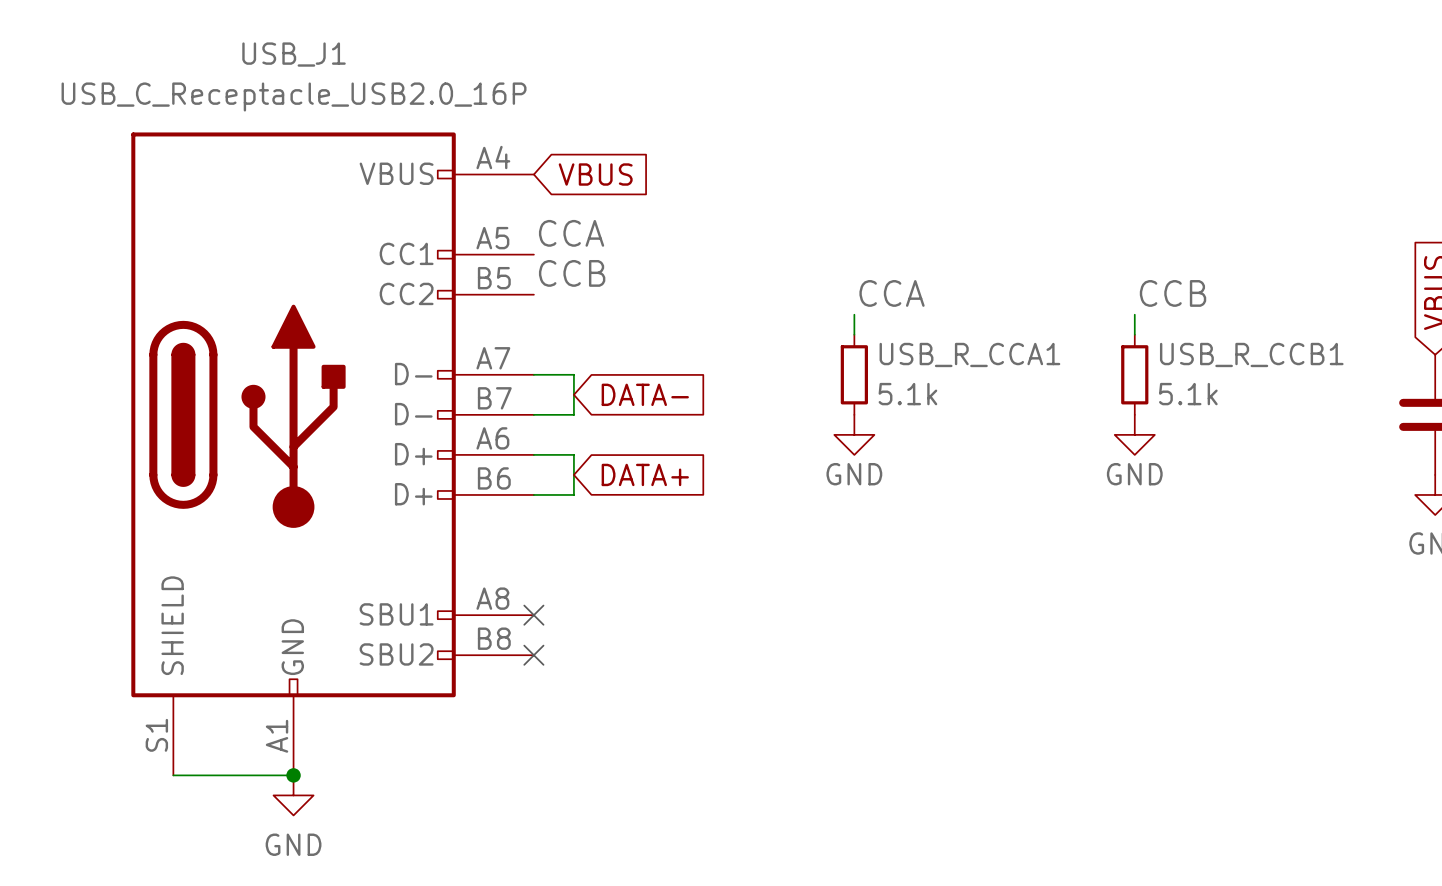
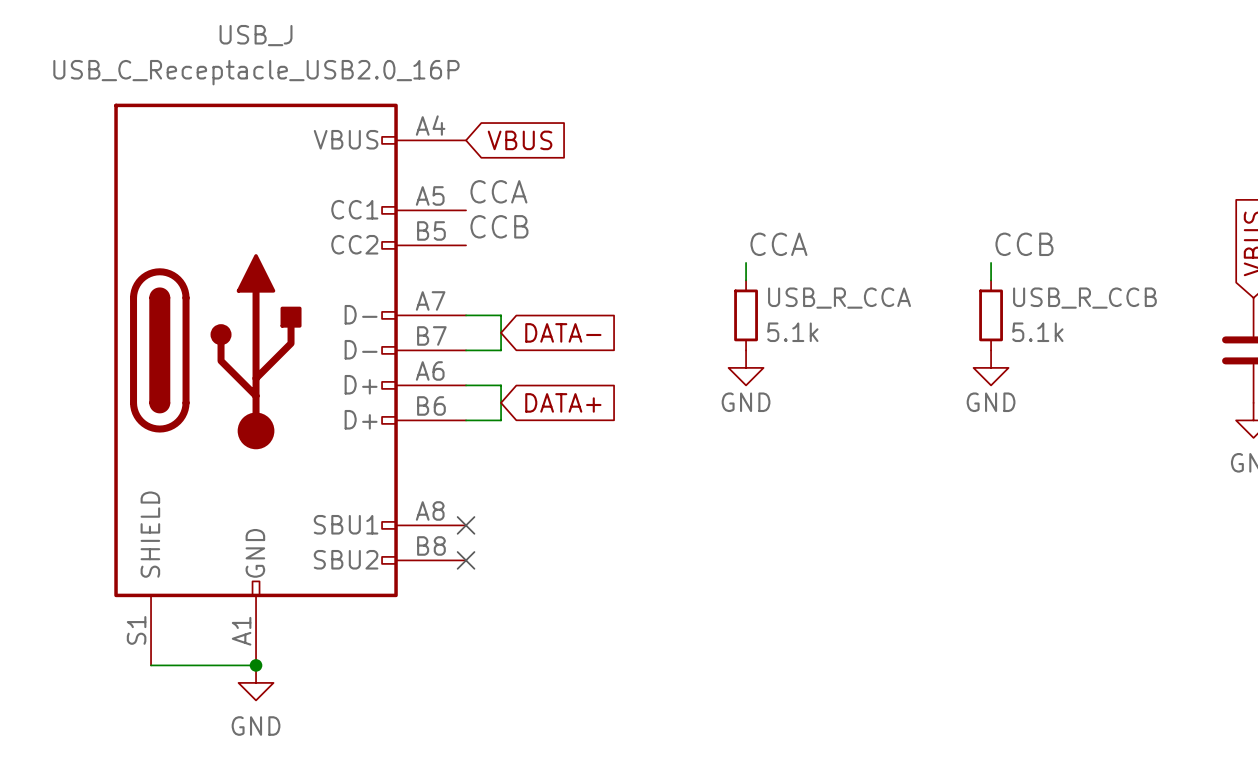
USB_J1 name: USB_J1 (294, 54) -> USB_J (256, 35)
USB_R_CCA1 name: USB_R_CCA1 (969, 354) -> USB_R_CCA (839, 298)
USB_R_CCB1 name: USB_R_CCB1 (1251, 354) -> USB_R_CCB (1084, 298)

